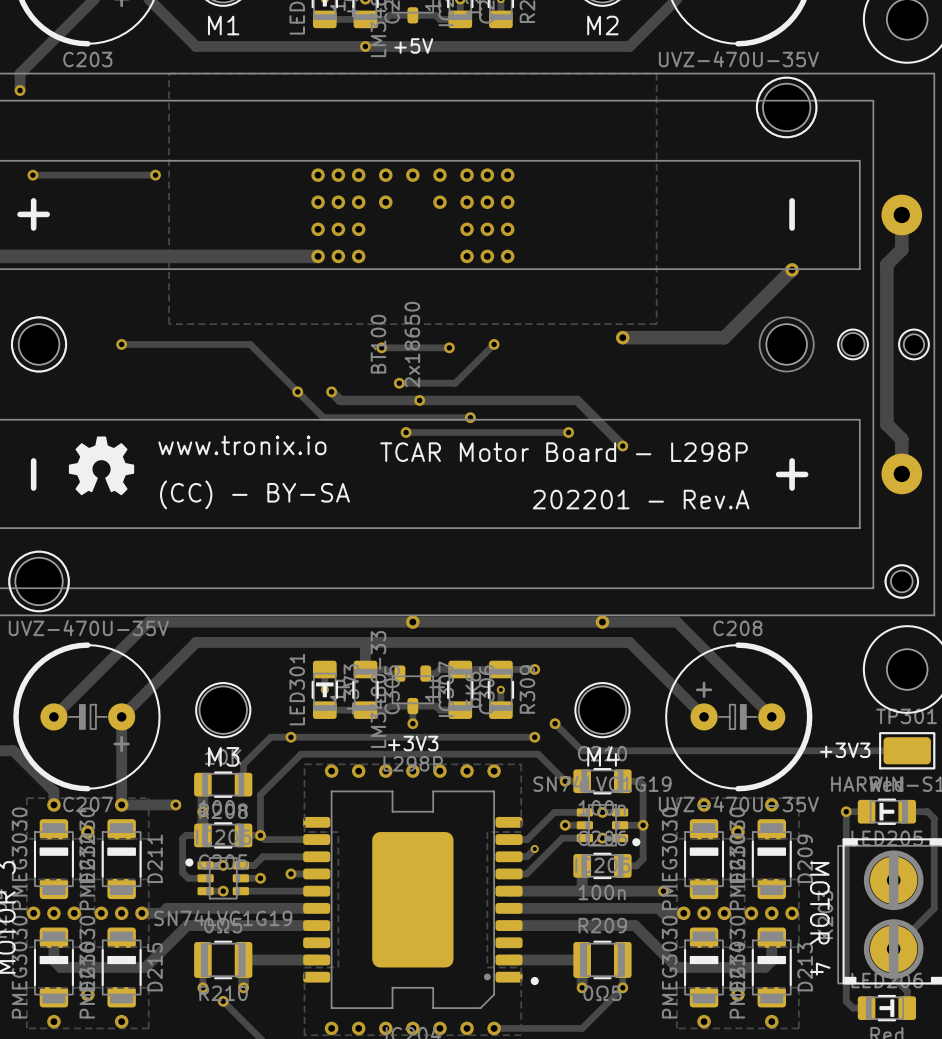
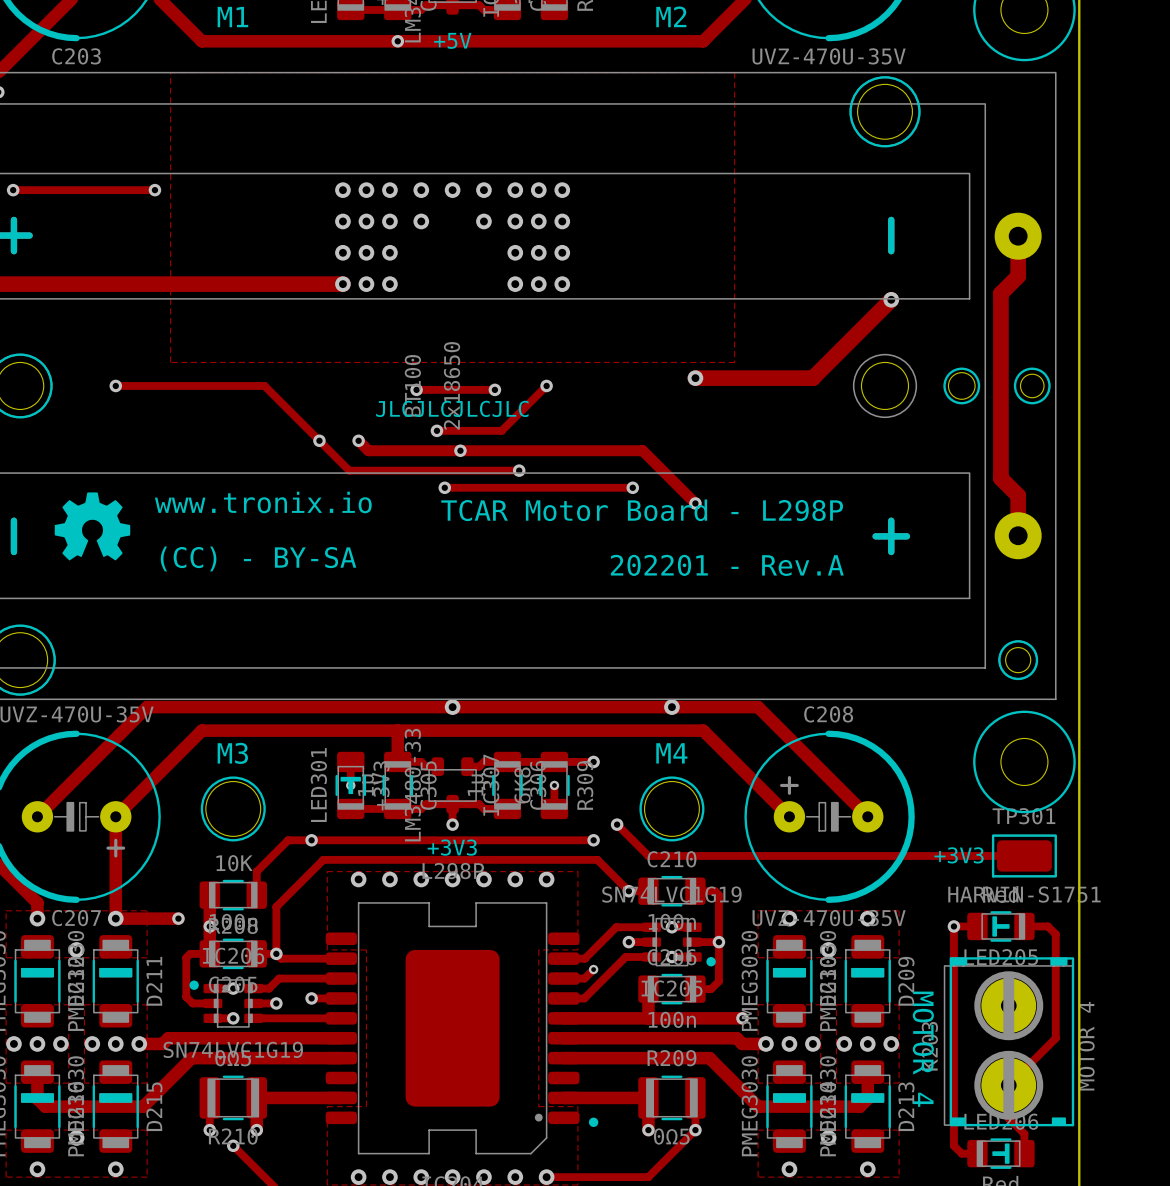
text: none -> JLCJLCJLCJLC (452, 408)
text position: M3 (223, 756) -> M3 (232, 753)
text position: M4 (603, 756) -> M4 (671, 753)

